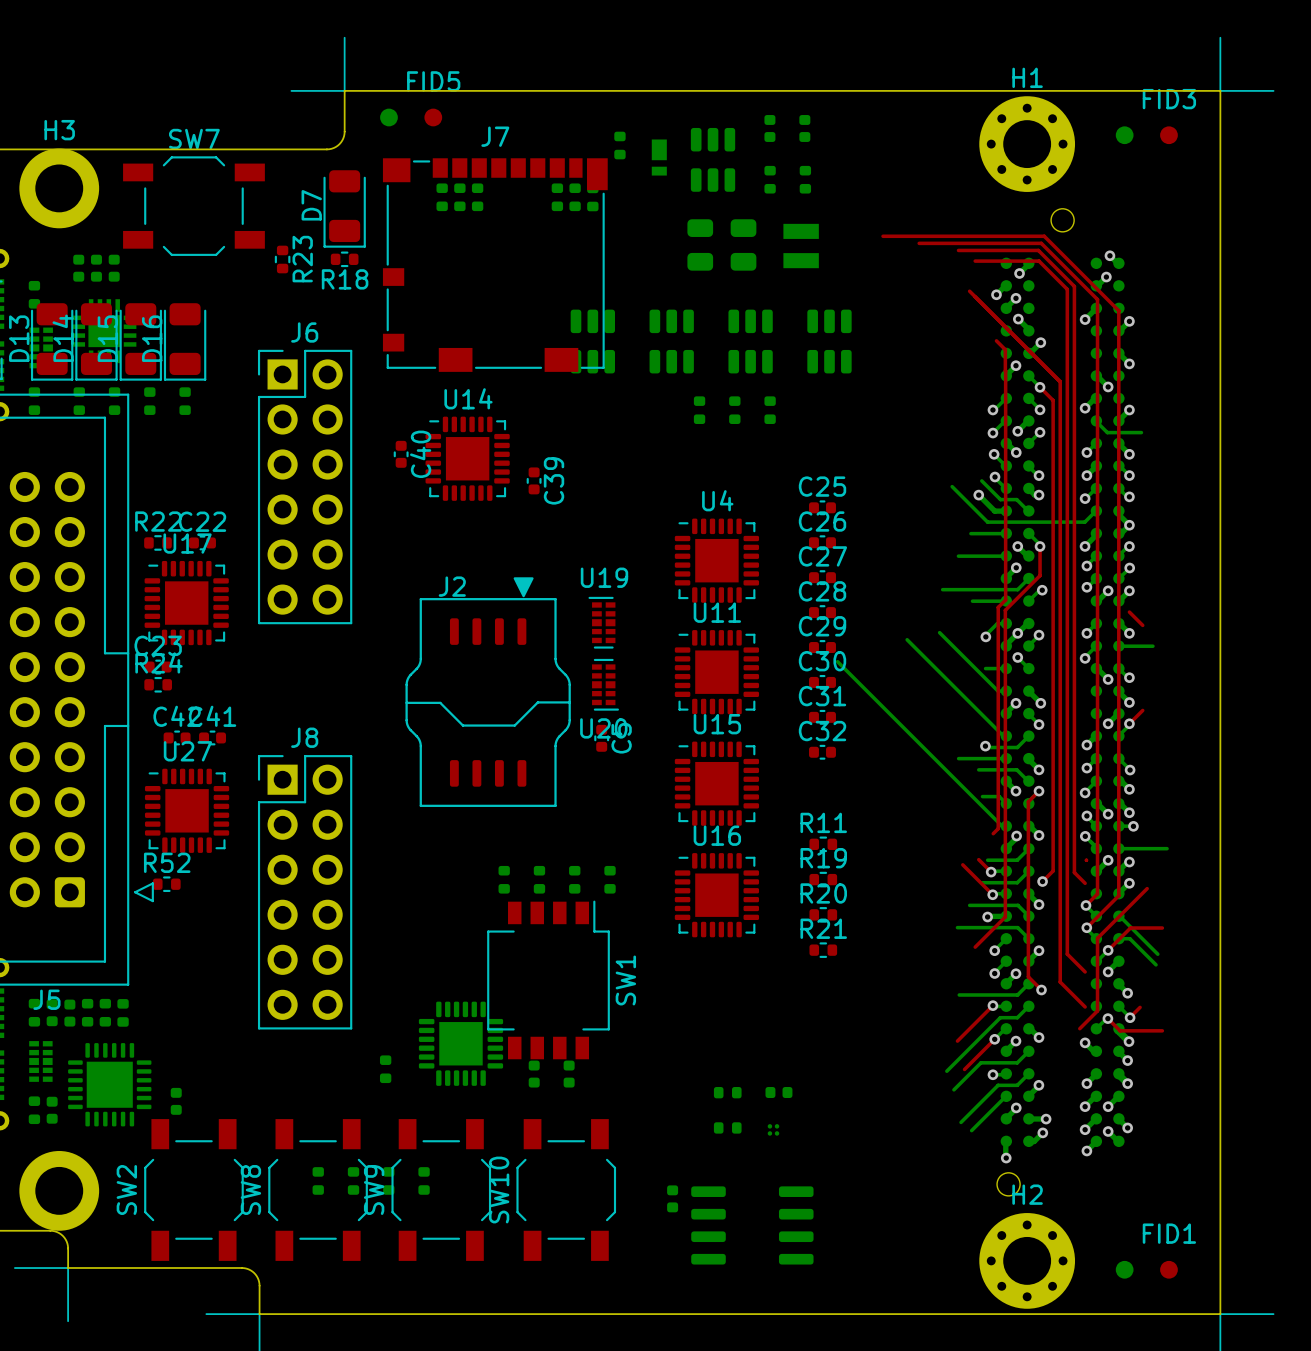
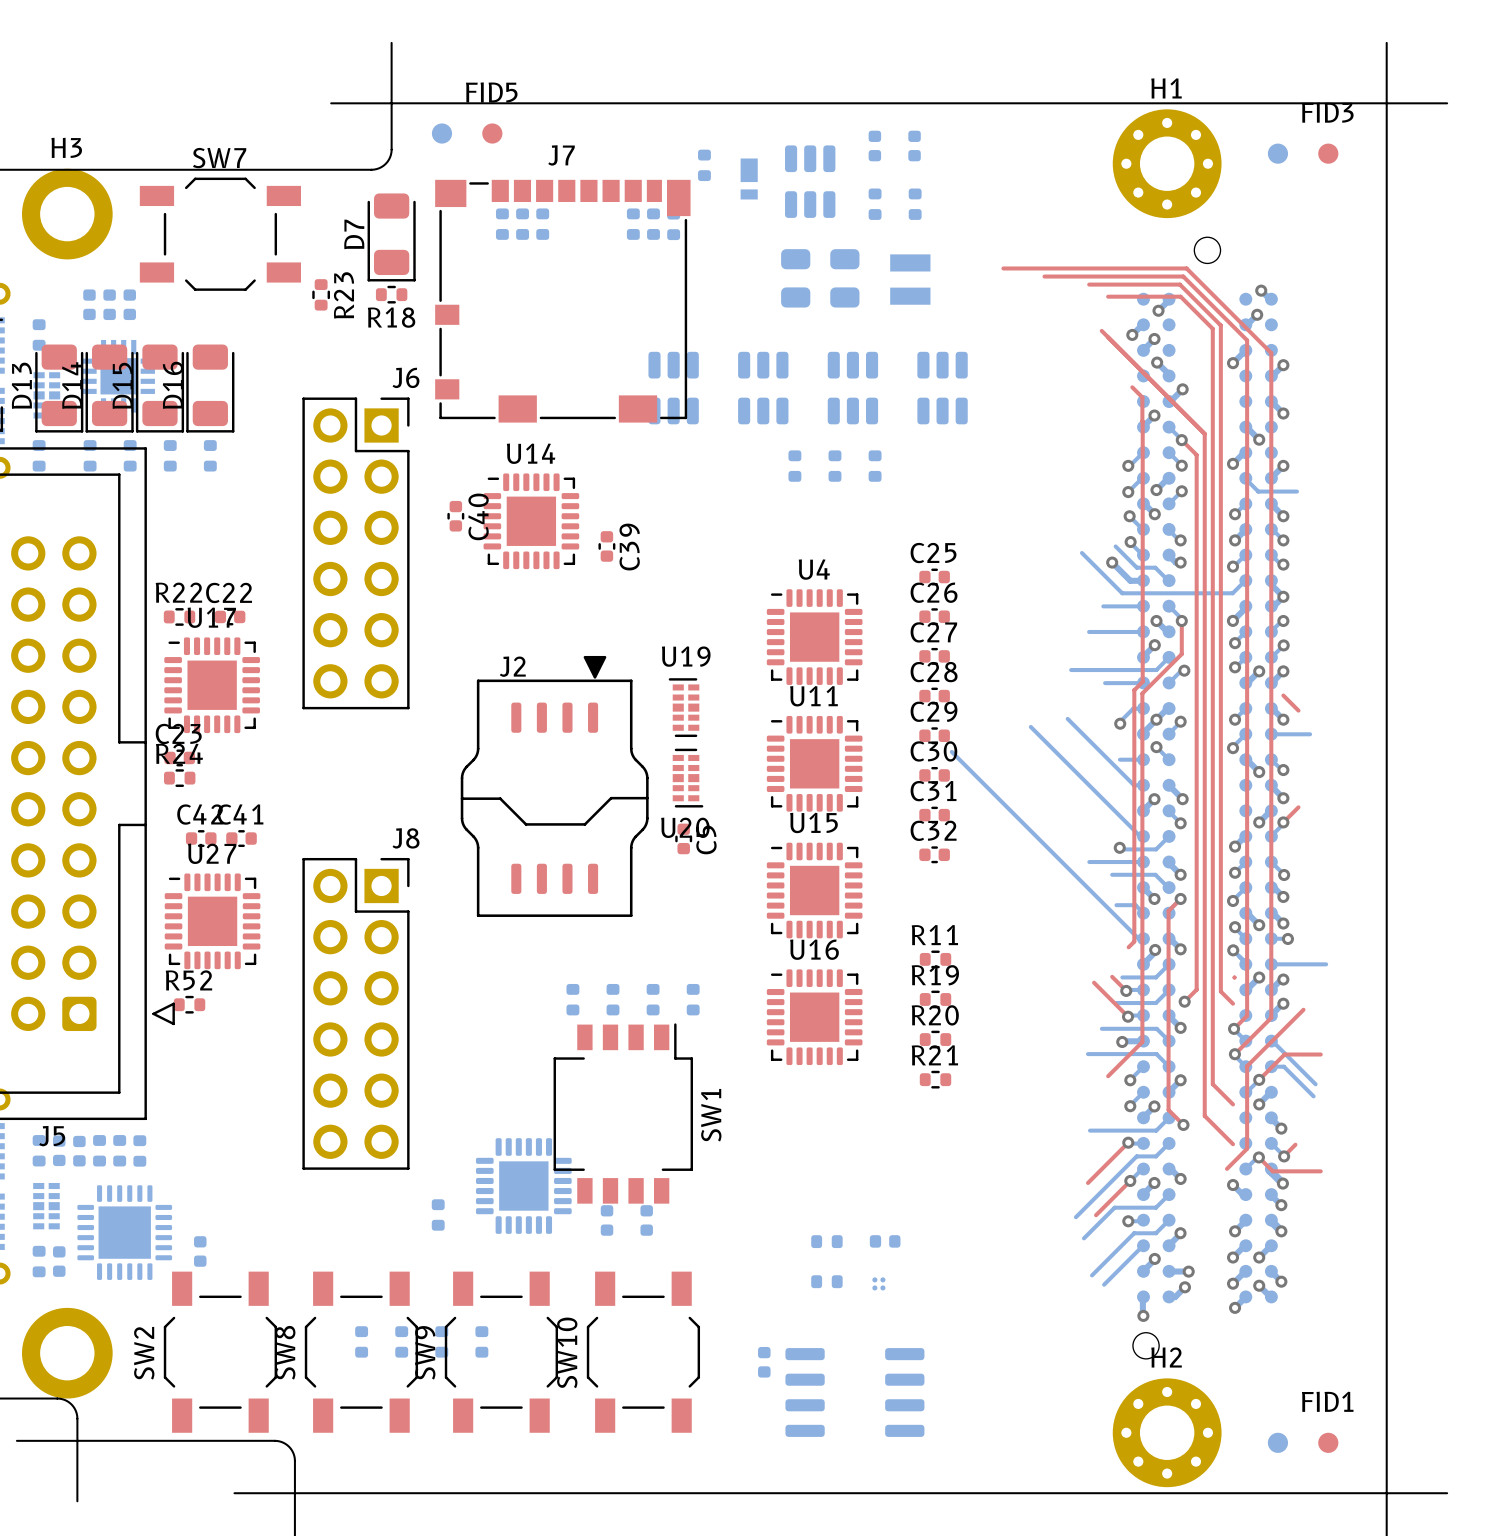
J6 name position: J6 (304, 332) -> J6 (405, 377)
J6 footprint: [257, 349, 353, 625] -> [302, 397, 410, 710]
J8 name position: J8 (304, 737) -> J8 (406, 838)
J8 footprint: [257, 755, 353, 1030] -> [302, 857, 410, 1170]

